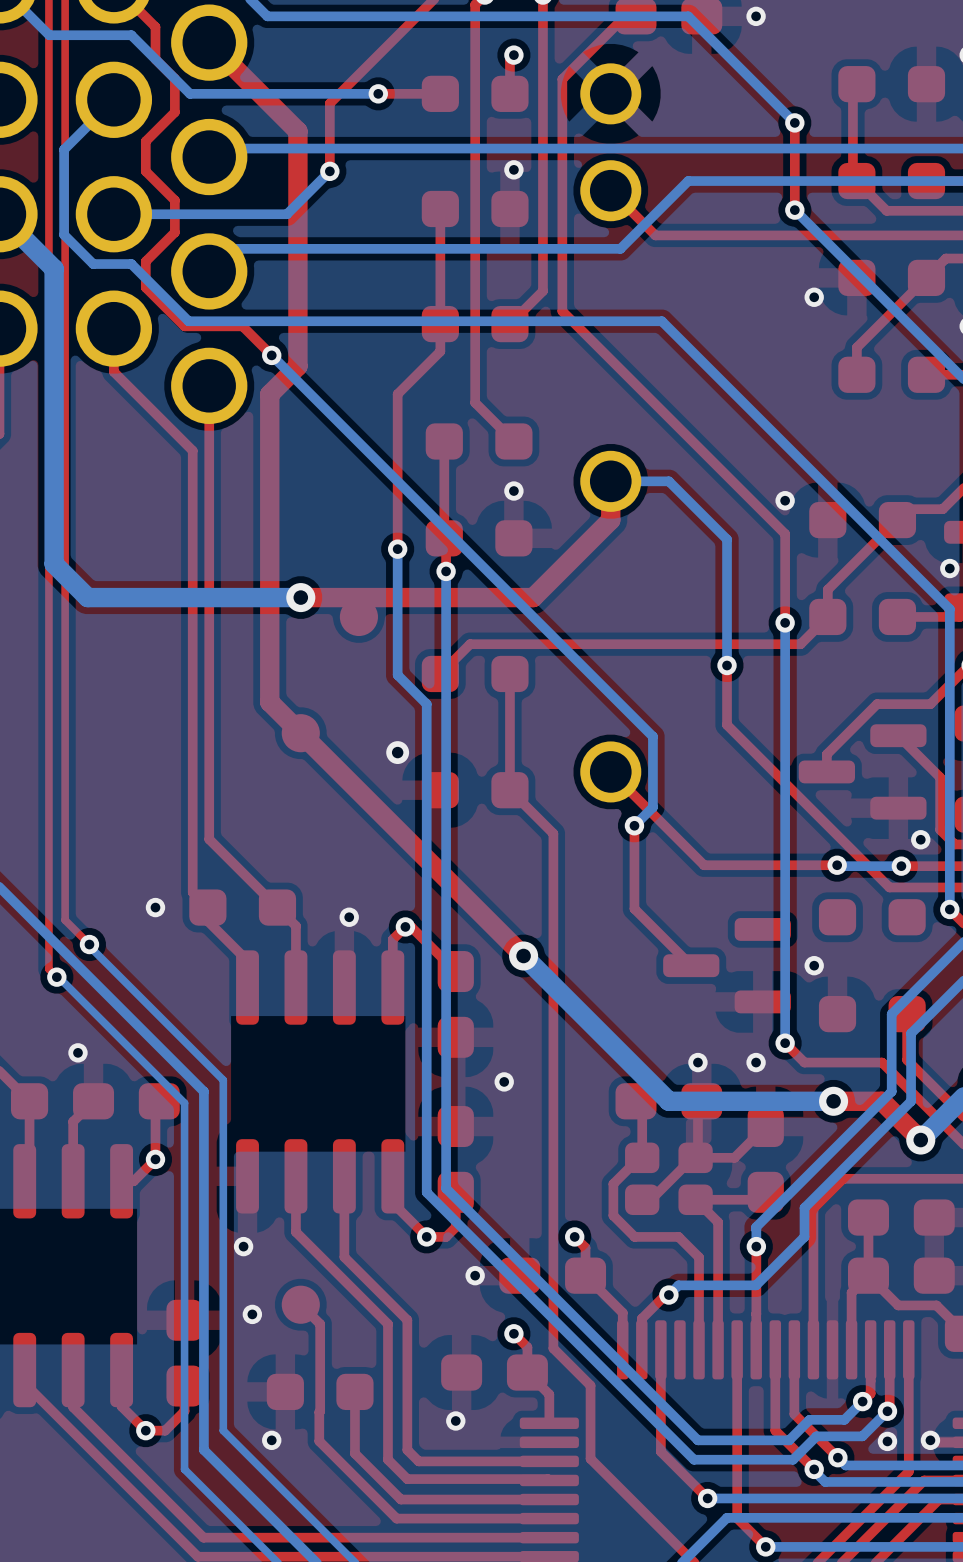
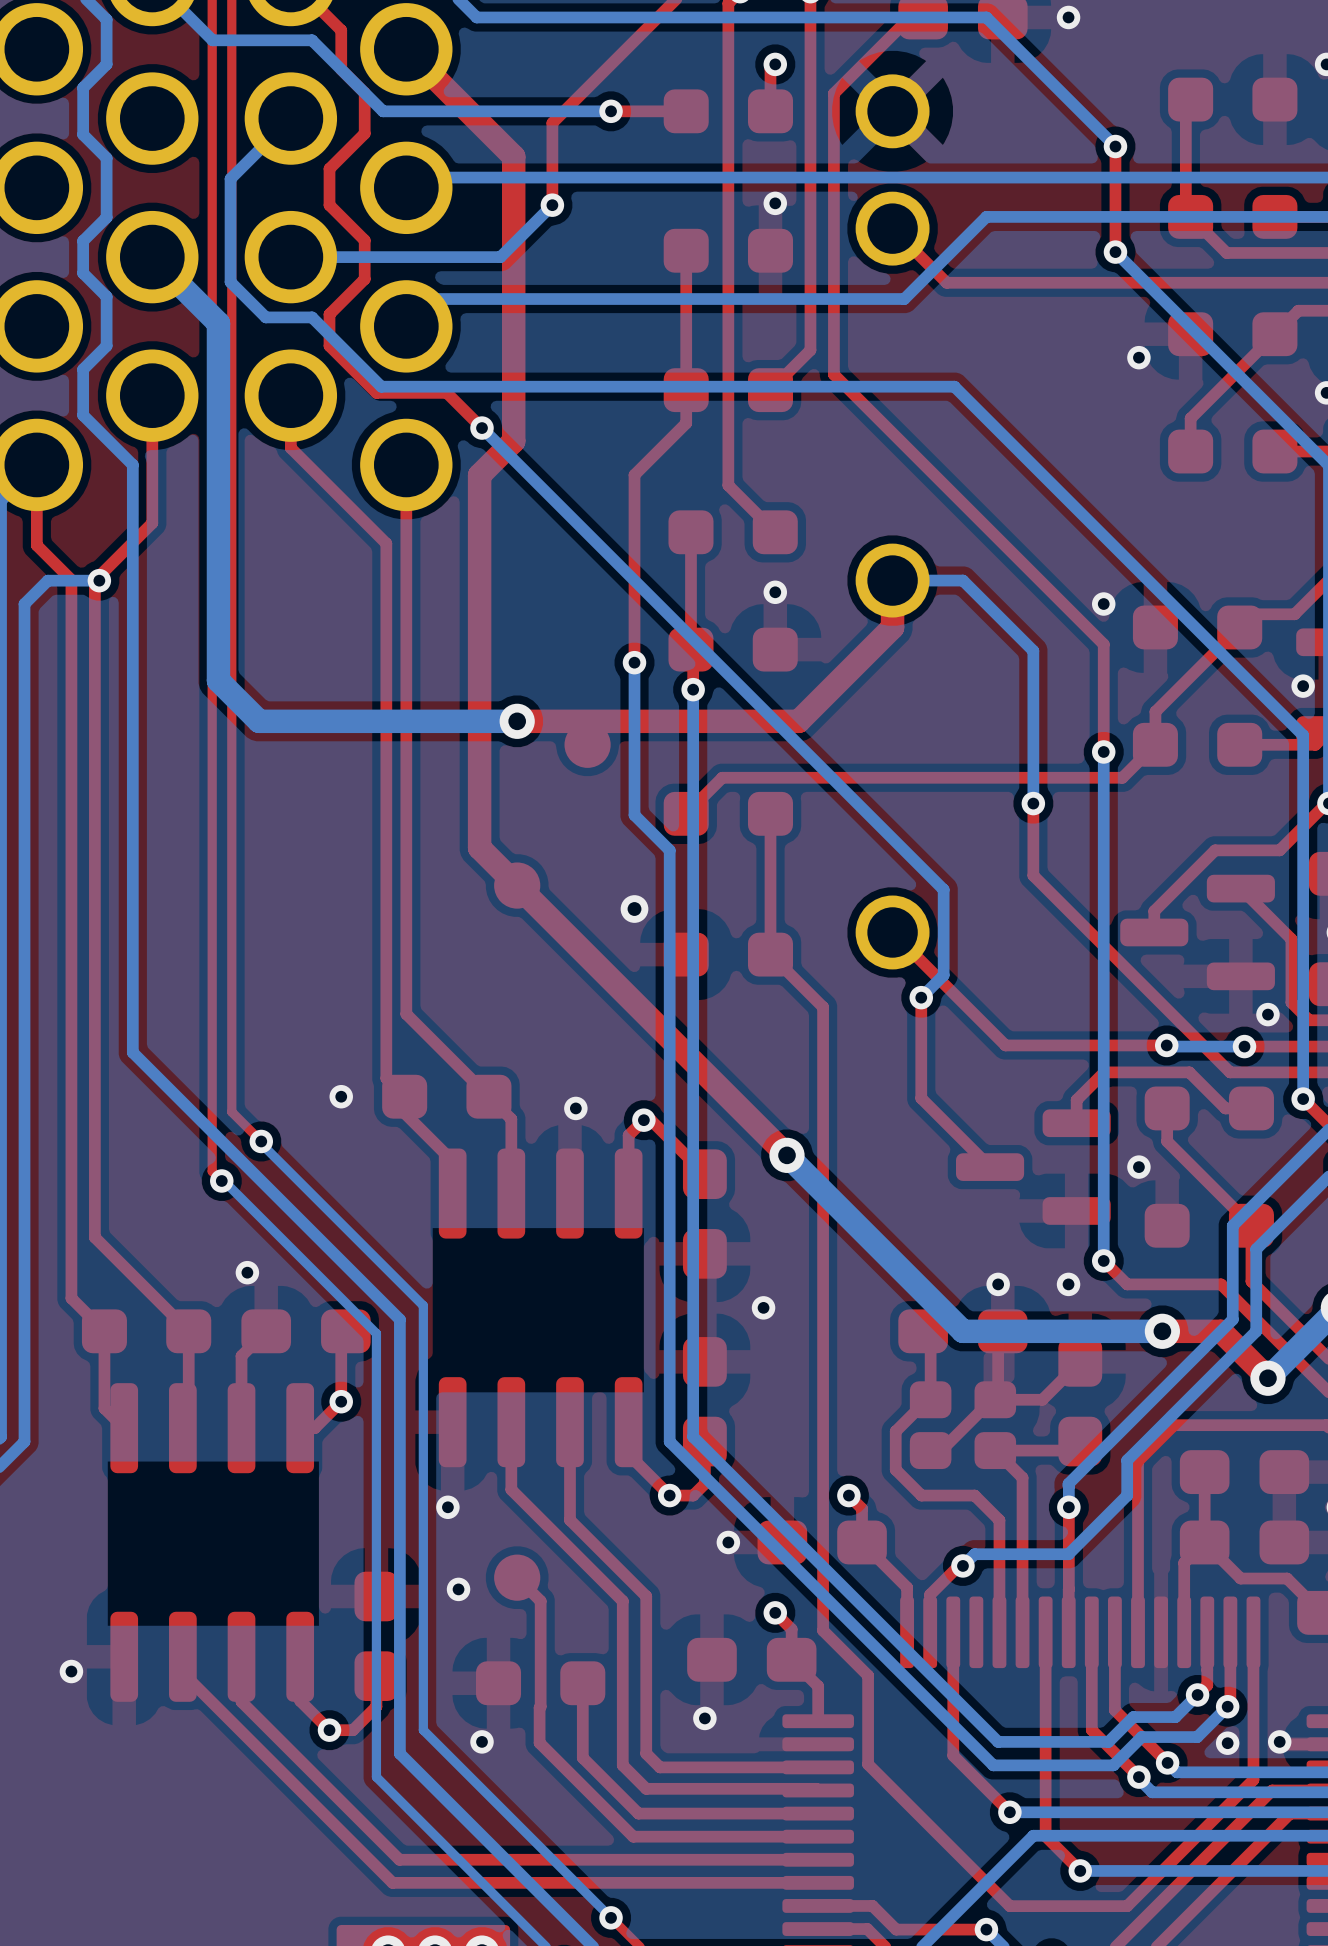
top track: none -> (1167, 1108) (1167, 1141) (1251, 1225)
top track: none -> (1251, 1108) (1225, 1108) (1189, 1072) (1104, 1072) (1076, 1100) (1076, 1123)

